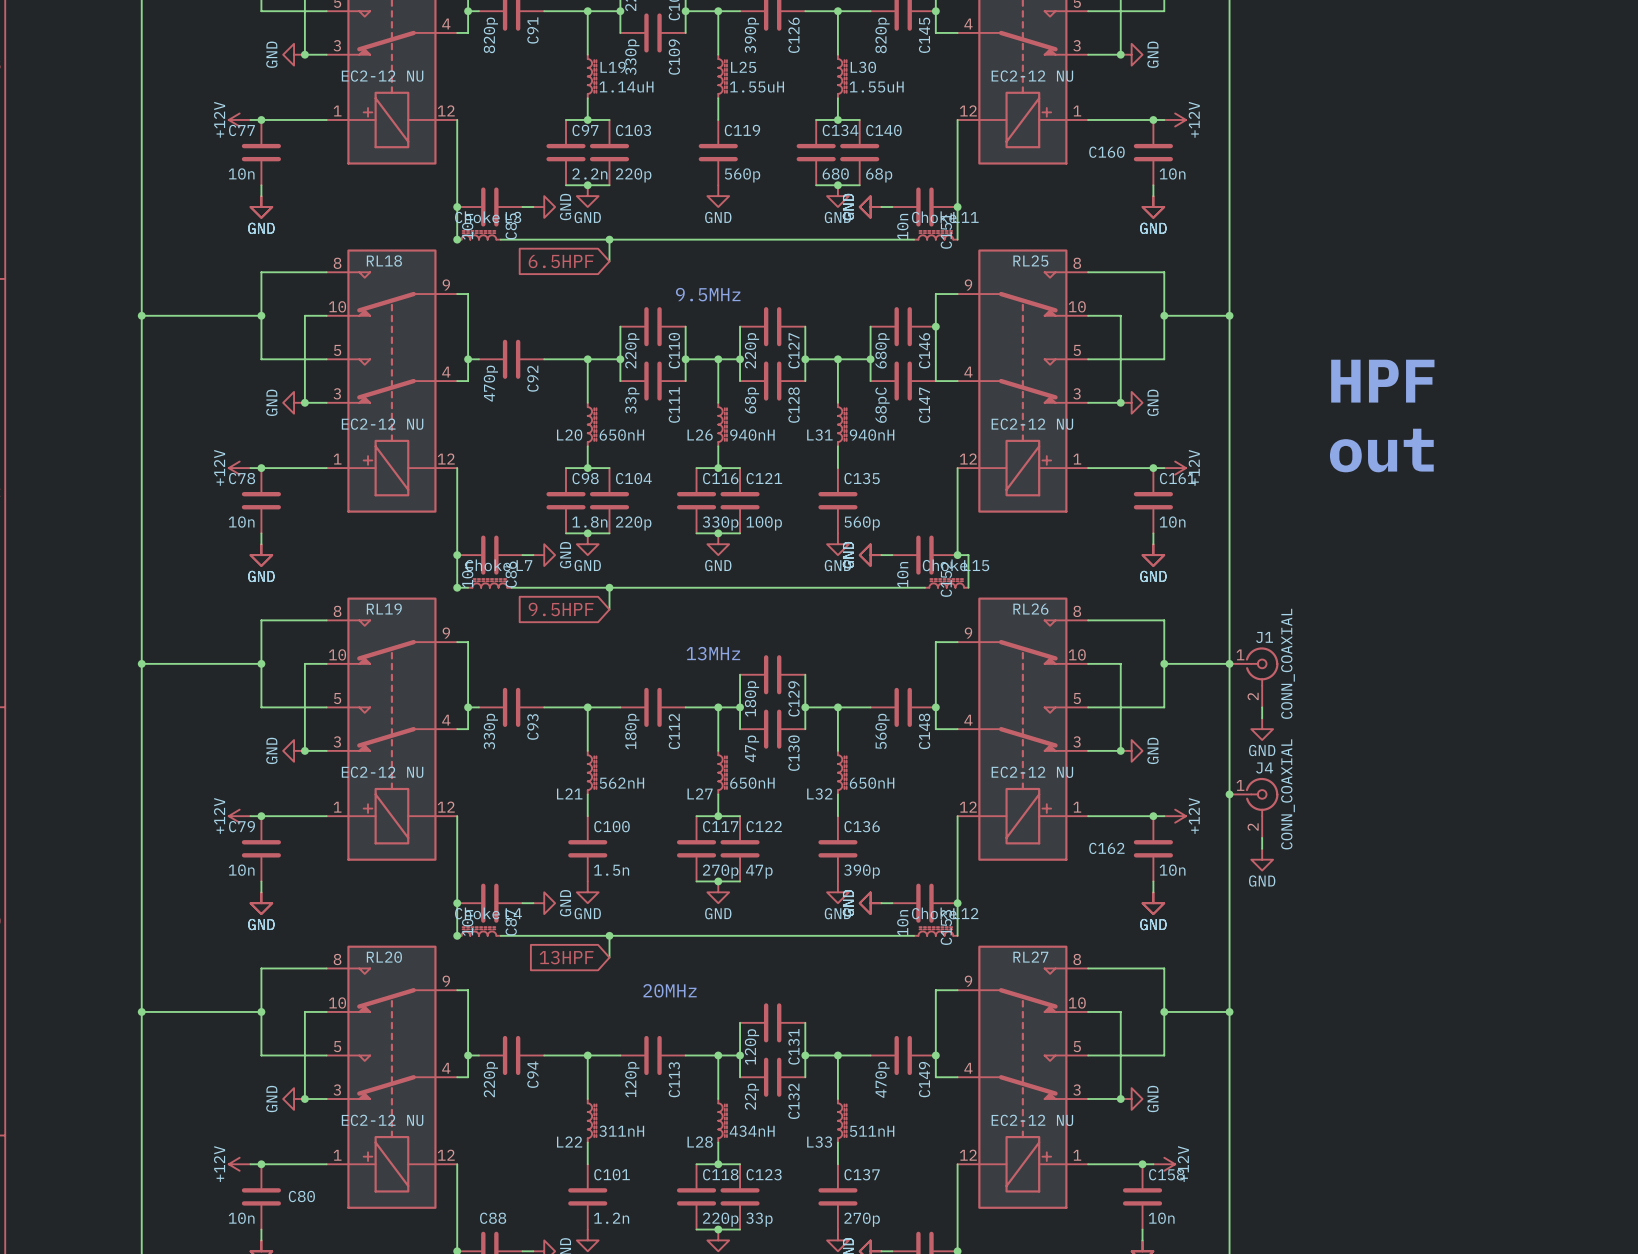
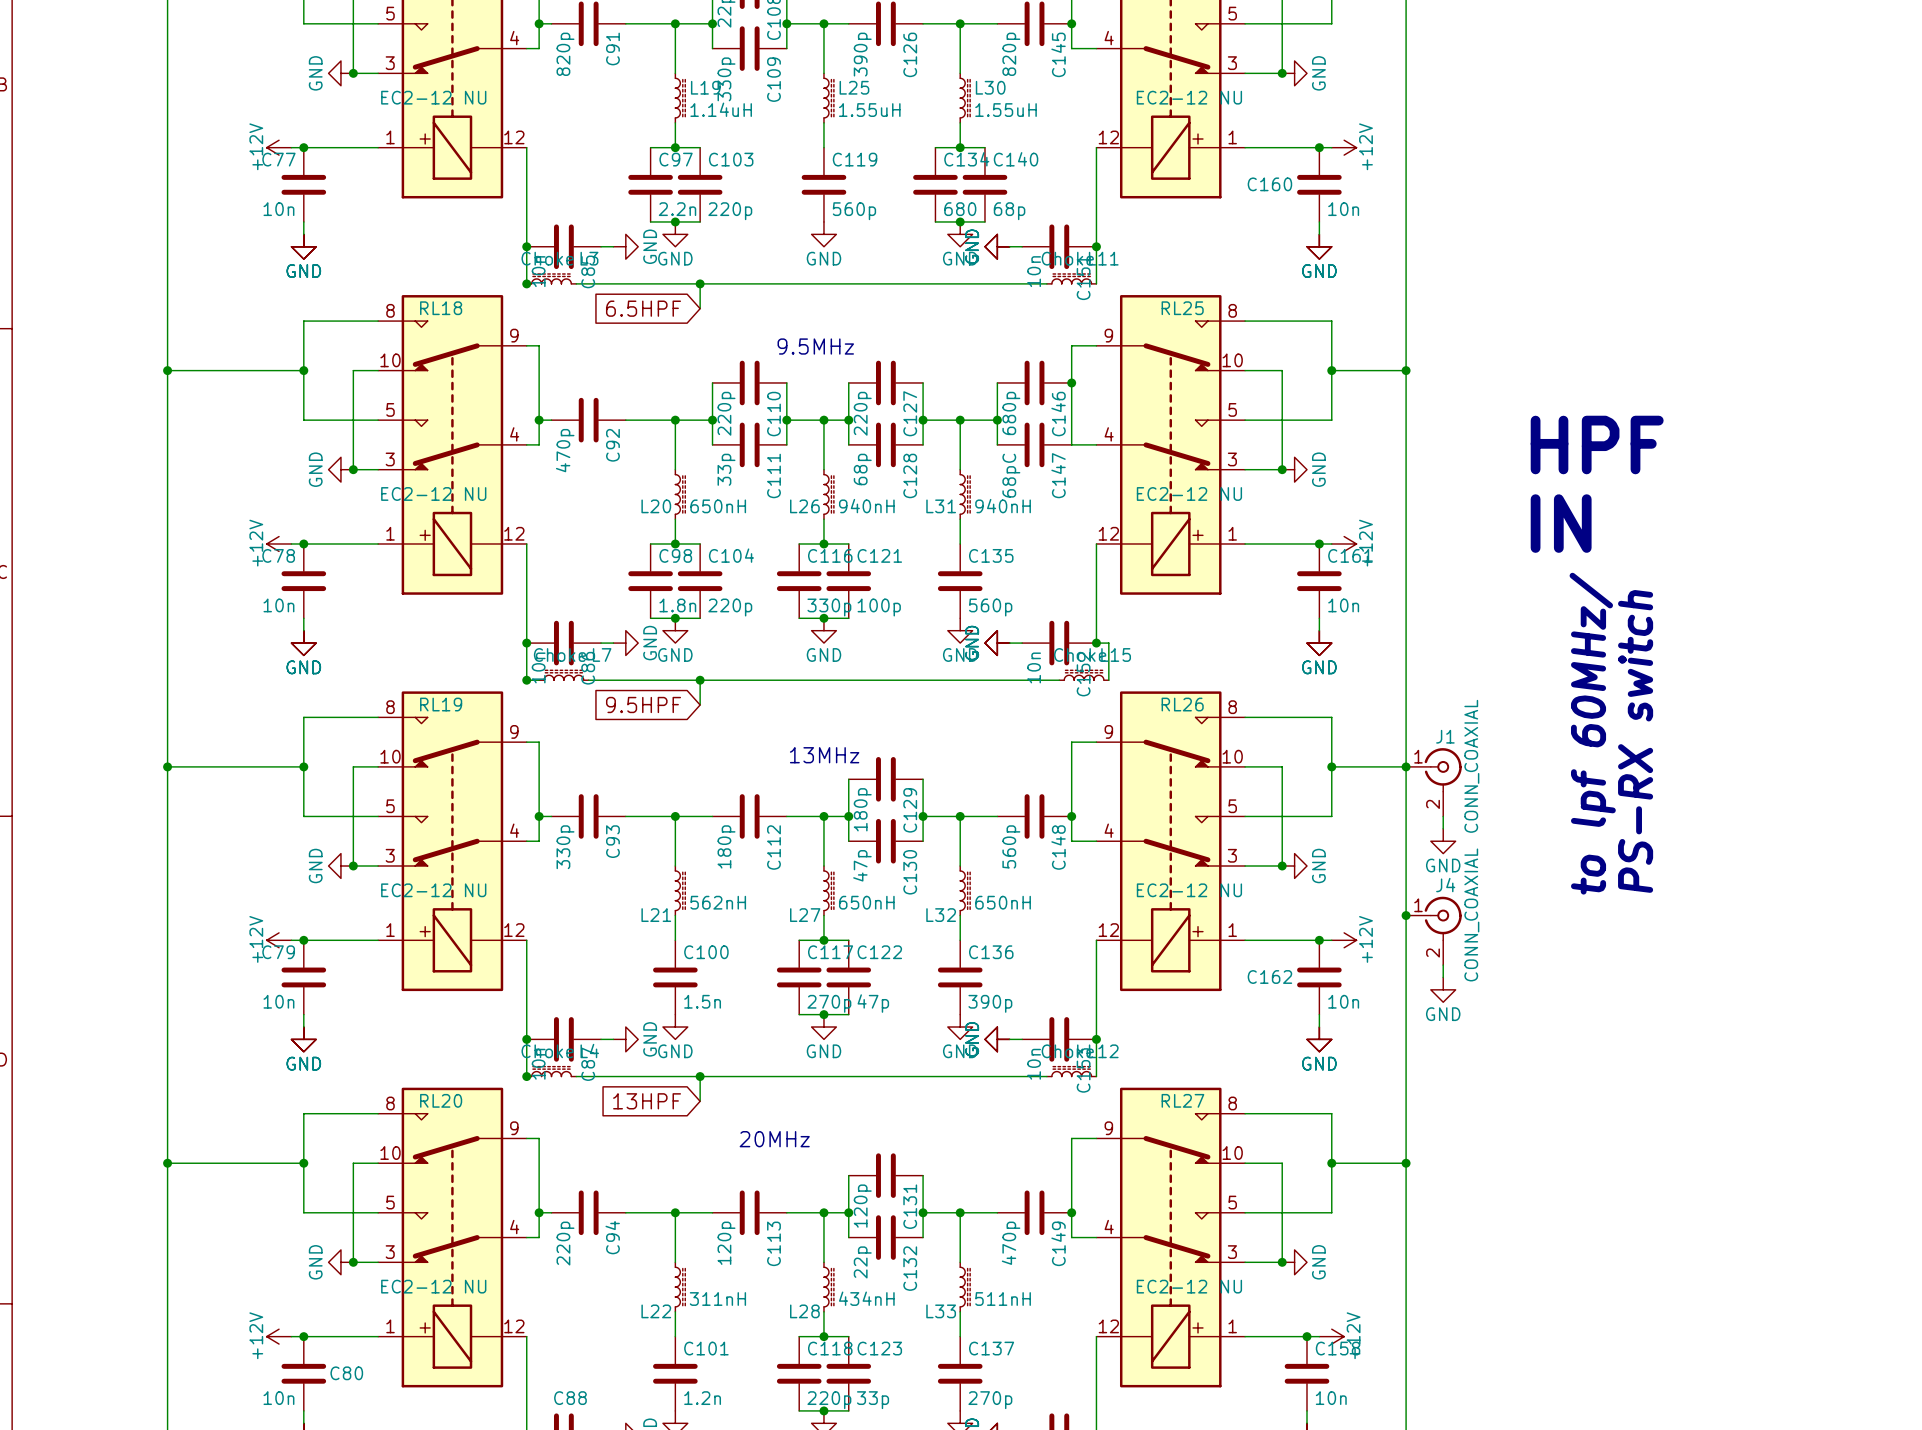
text: out (1381, 450) -> IN (1561, 523)
text: none -> to lpf 60MHz/ (1592, 733)
text: none -> PS-RX switch (1635, 741)

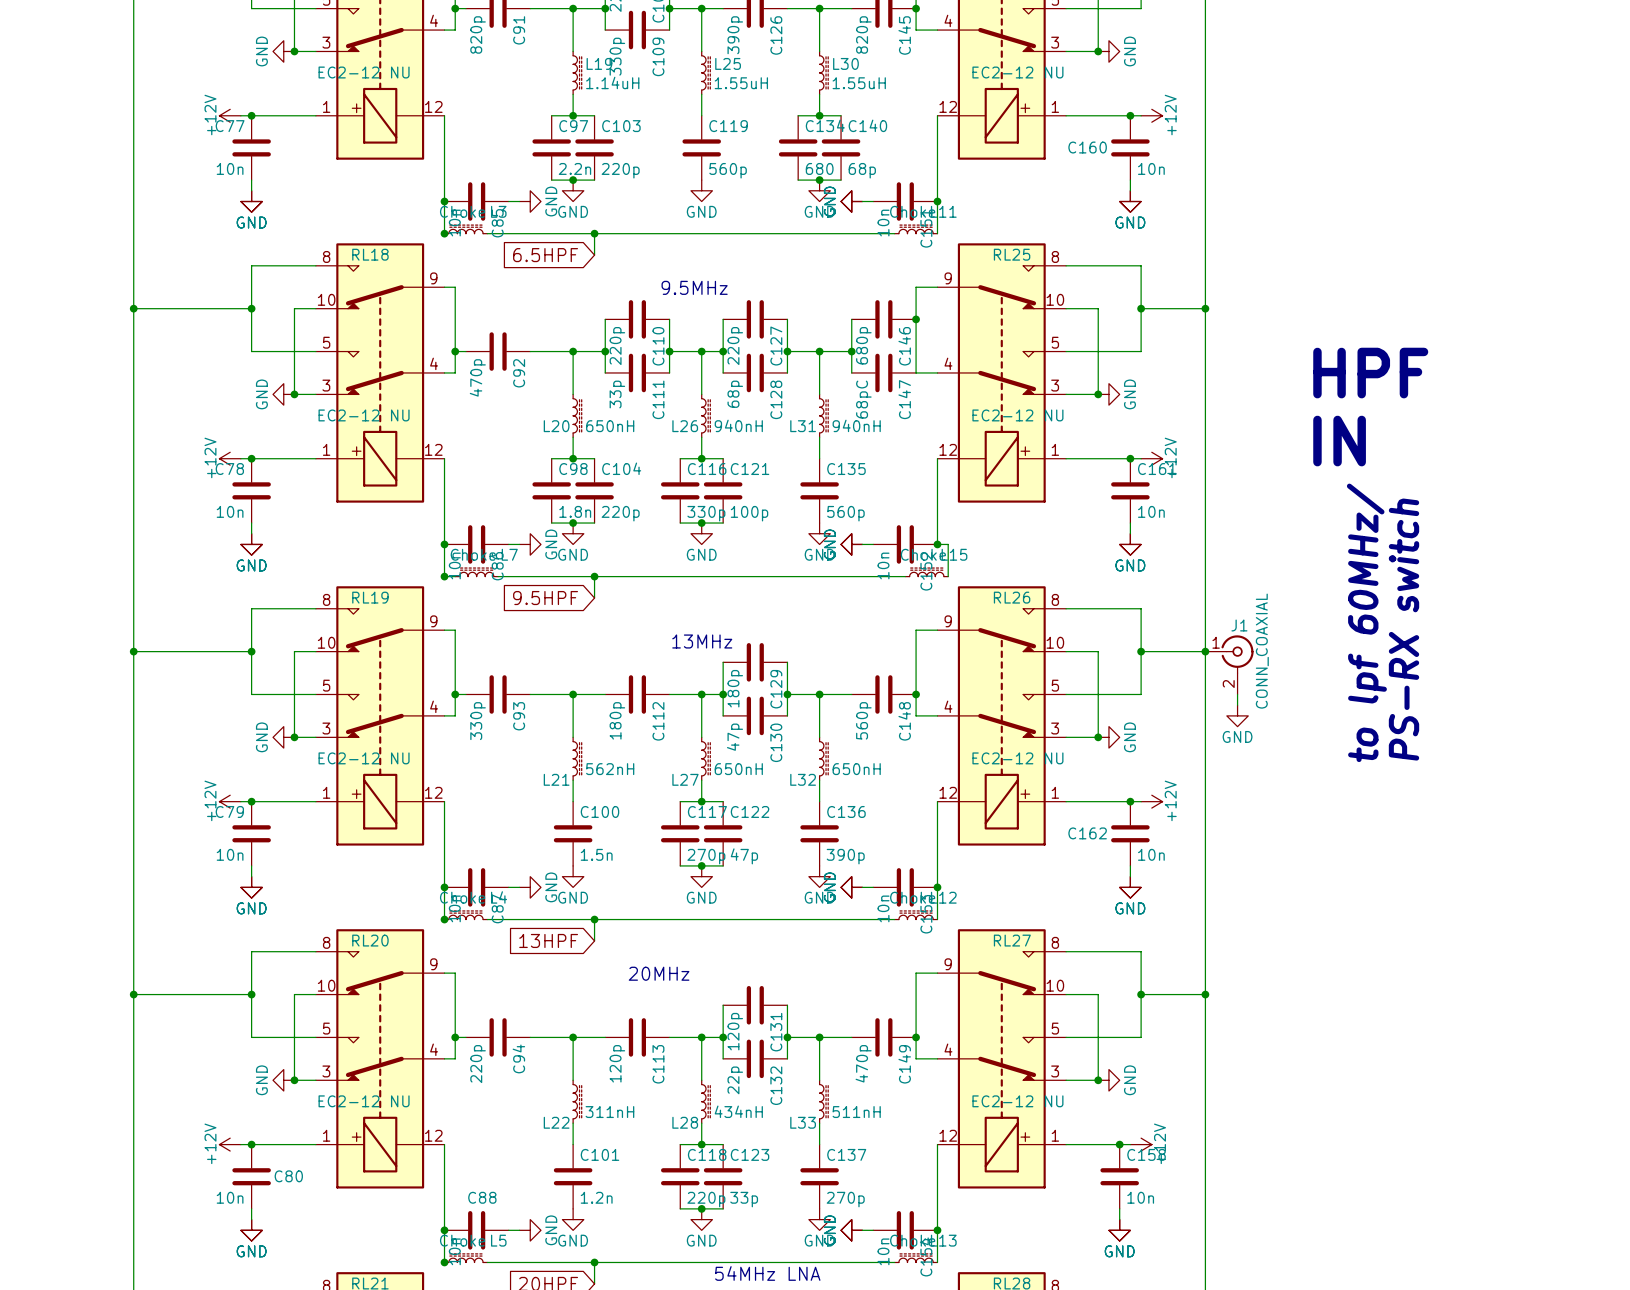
junction: (1406, 915) -> none
J4: CONN_COAXIAL (1433, 930) -> none
wire: (1443, 965) (1443, 977) -> none
power symbol: GND (1443, 989) -> none

